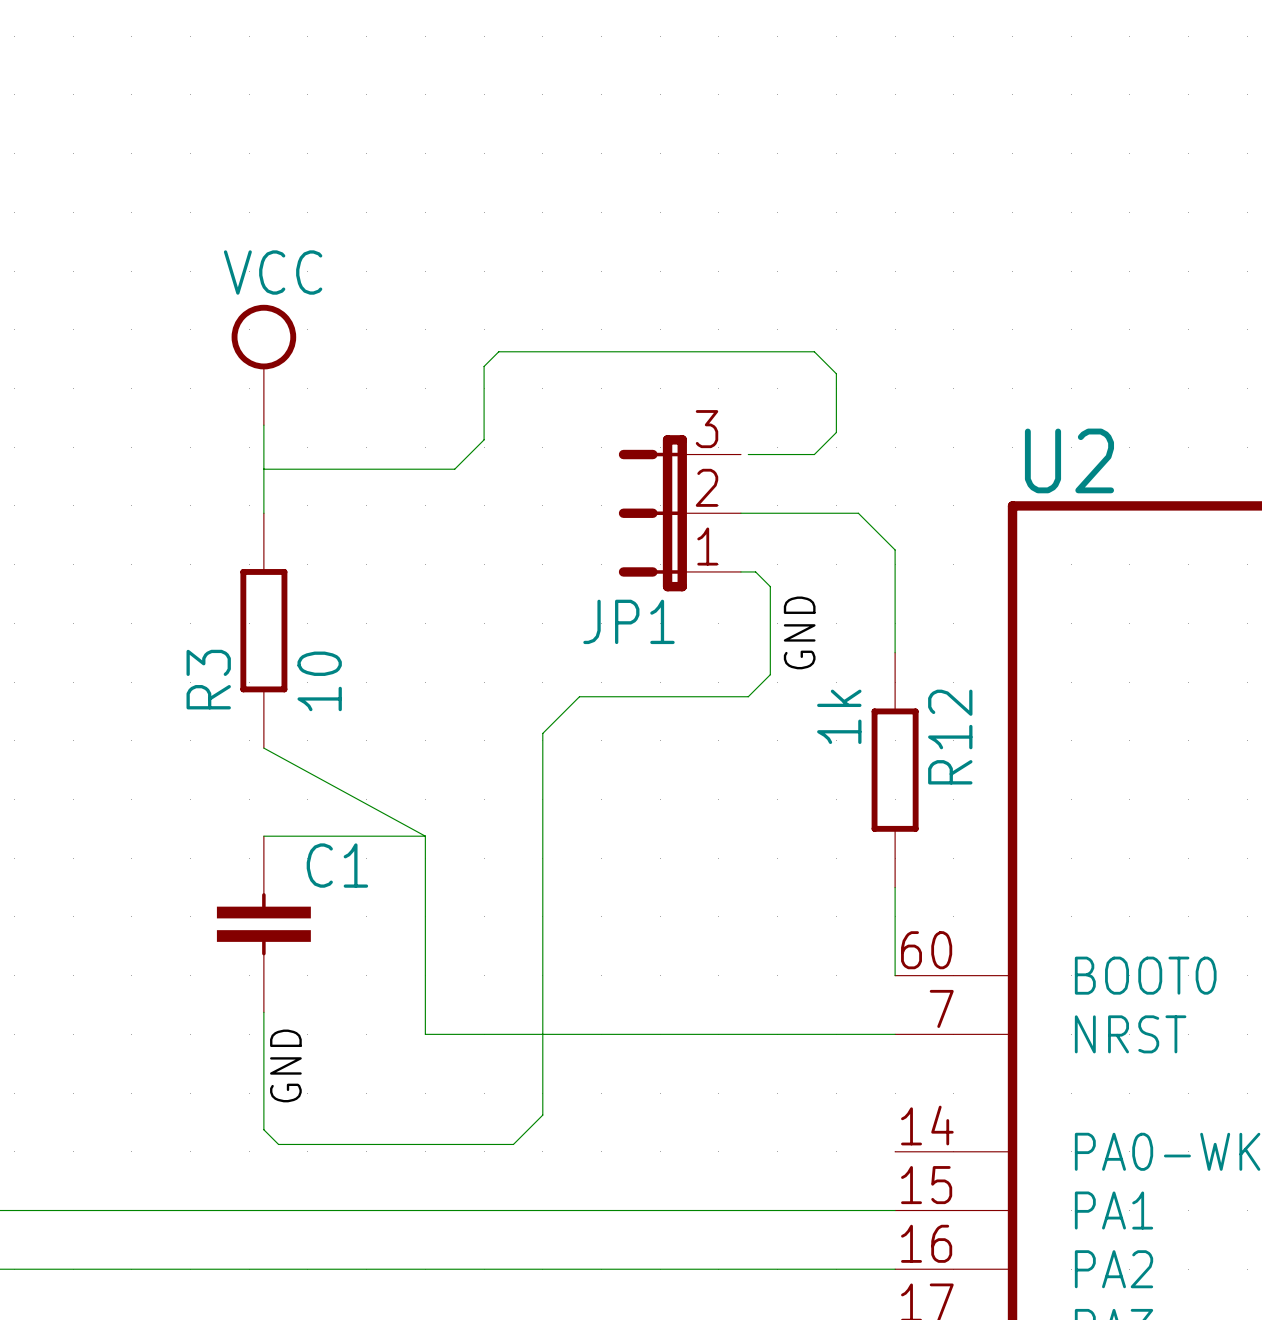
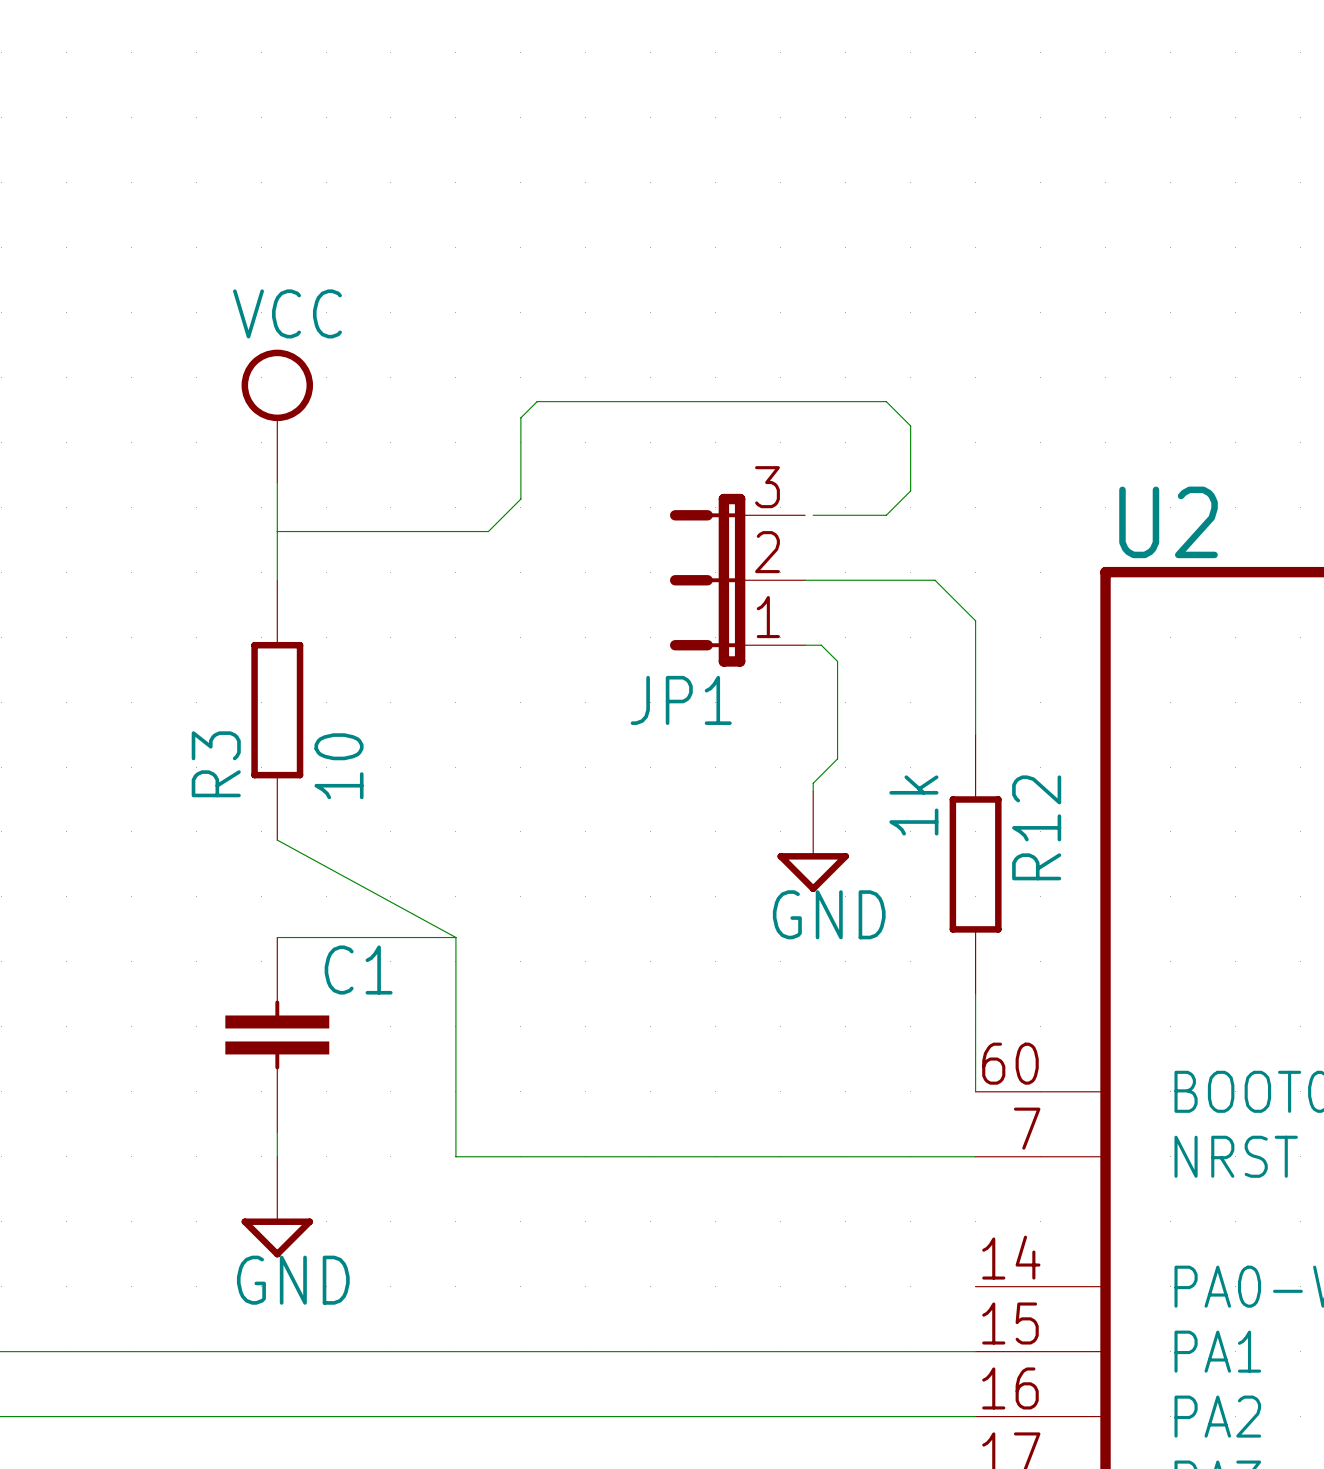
label: GND (799, 632) -> none
wire: (748, 696) (579, 696) (542, 733) (542, 1115) (513, 1144) (278, 1144) (263, 1129) (263, 1034) -> (813, 783) (813, 791)
power symbol: none -> GND (813, 841)
label: GND (285, 1065) -> none
power symbol: none -> GND (277, 1207)

